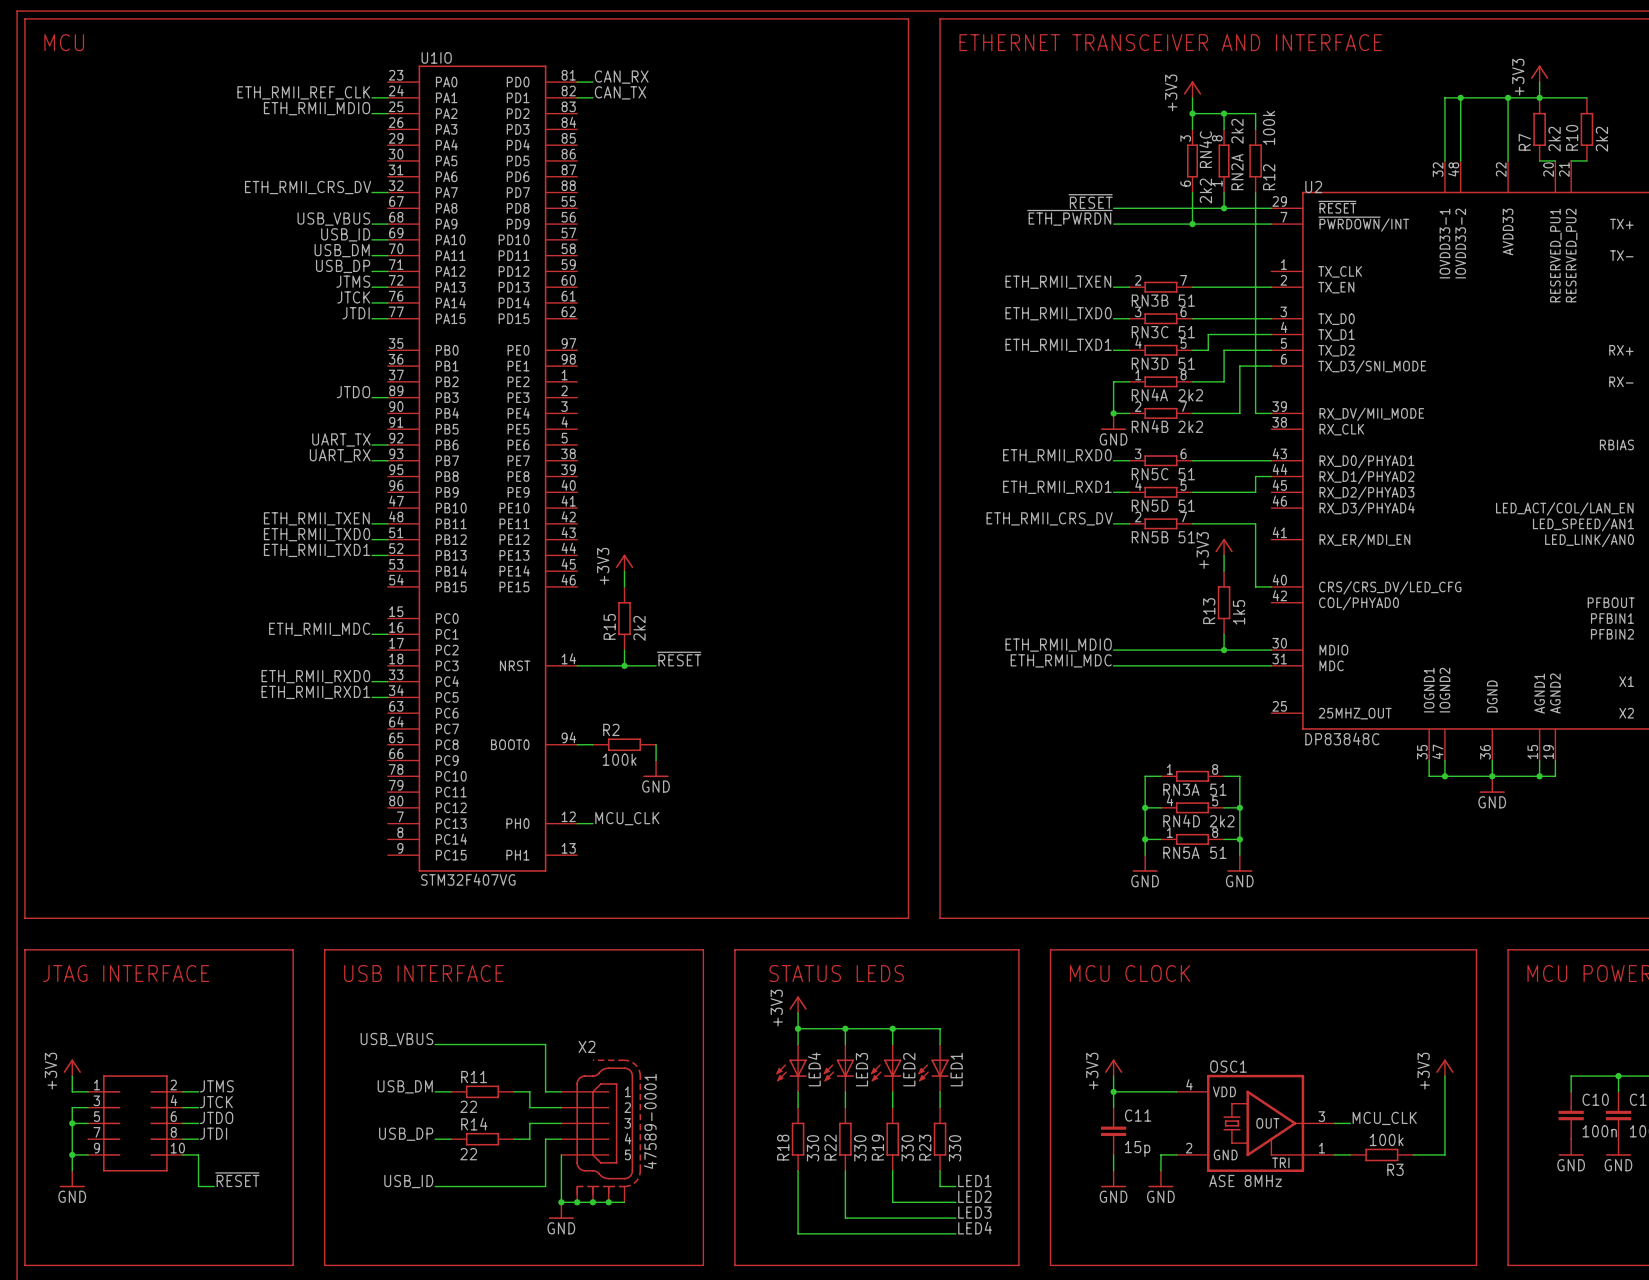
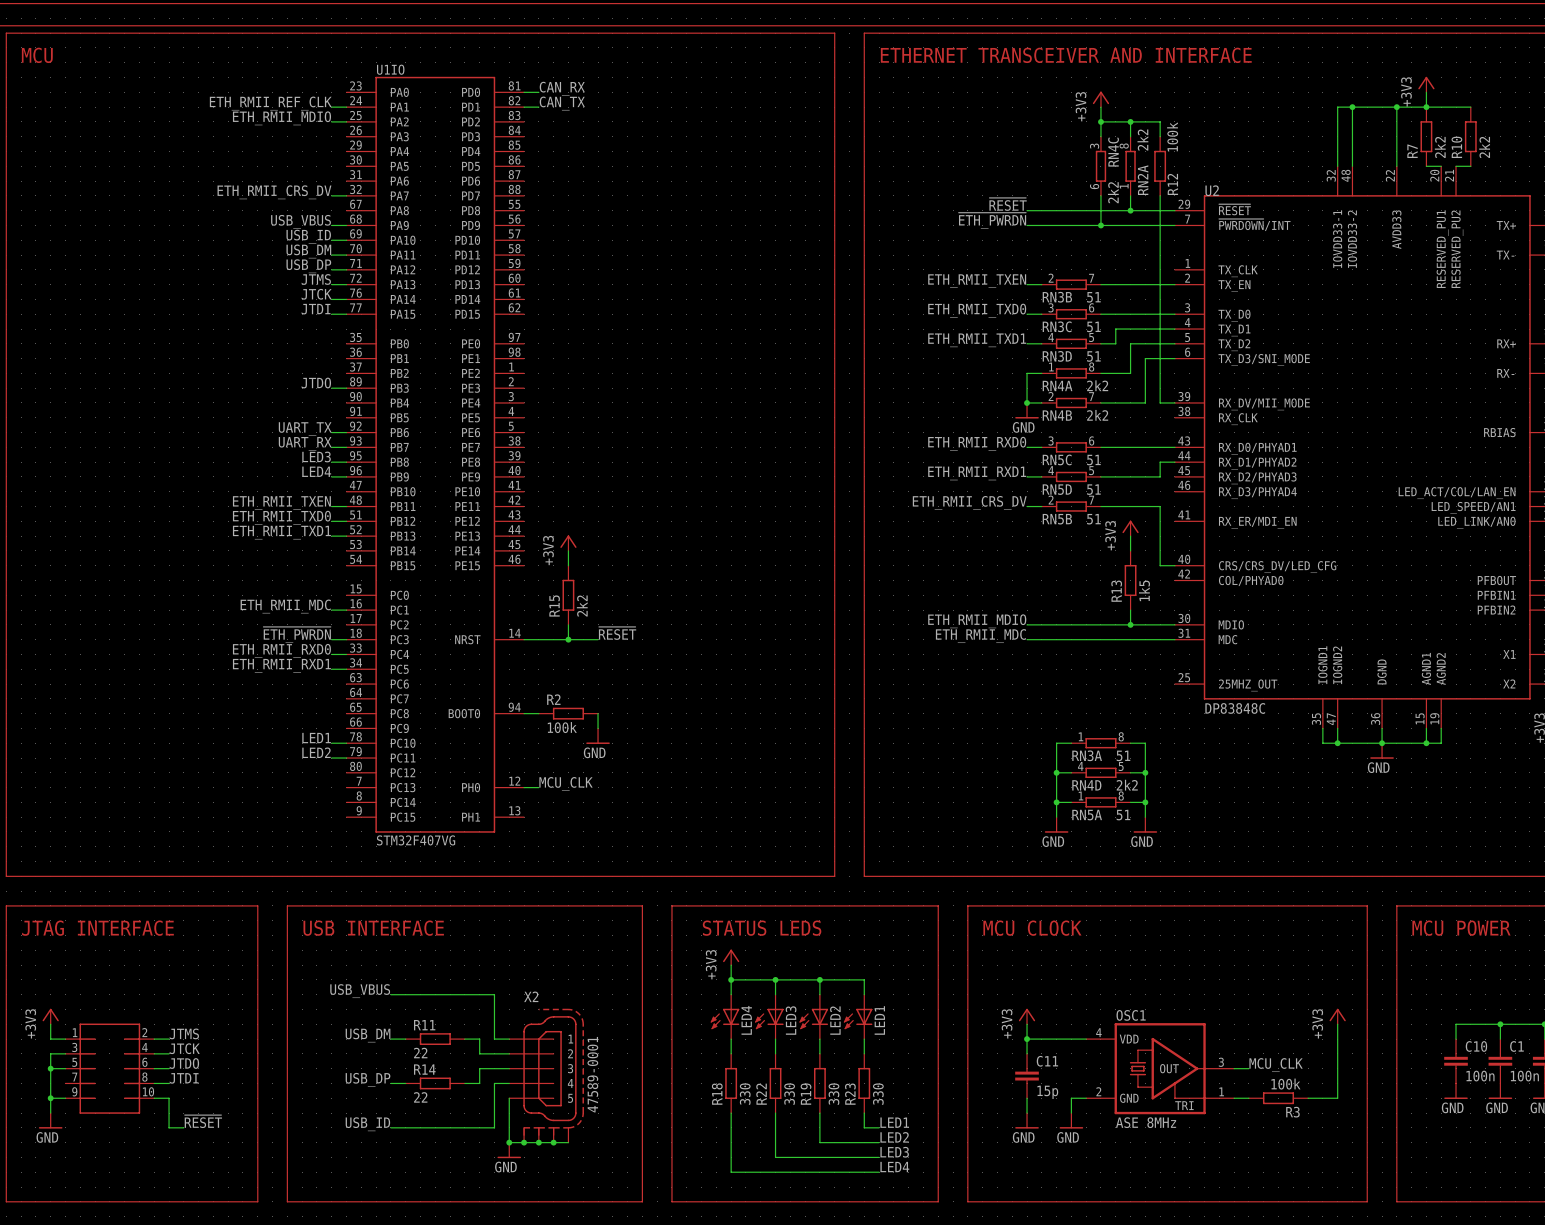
label: none -> LED3 (316, 456)
wire: none -> (331, 462) (346, 462)
label: none -> LED4 (316, 471)
wire: none -> (331, 476) (346, 476)
label: none -> ~{ETH_PWRDN} (297, 634)
wire: none -> (331, 639) (346, 639)
label: none -> LED1 (316, 738)
wire: none -> (331, 743) (346, 743)
label: none -> LED2 (316, 752)
wire: none -> (331, 758) (346, 758)

